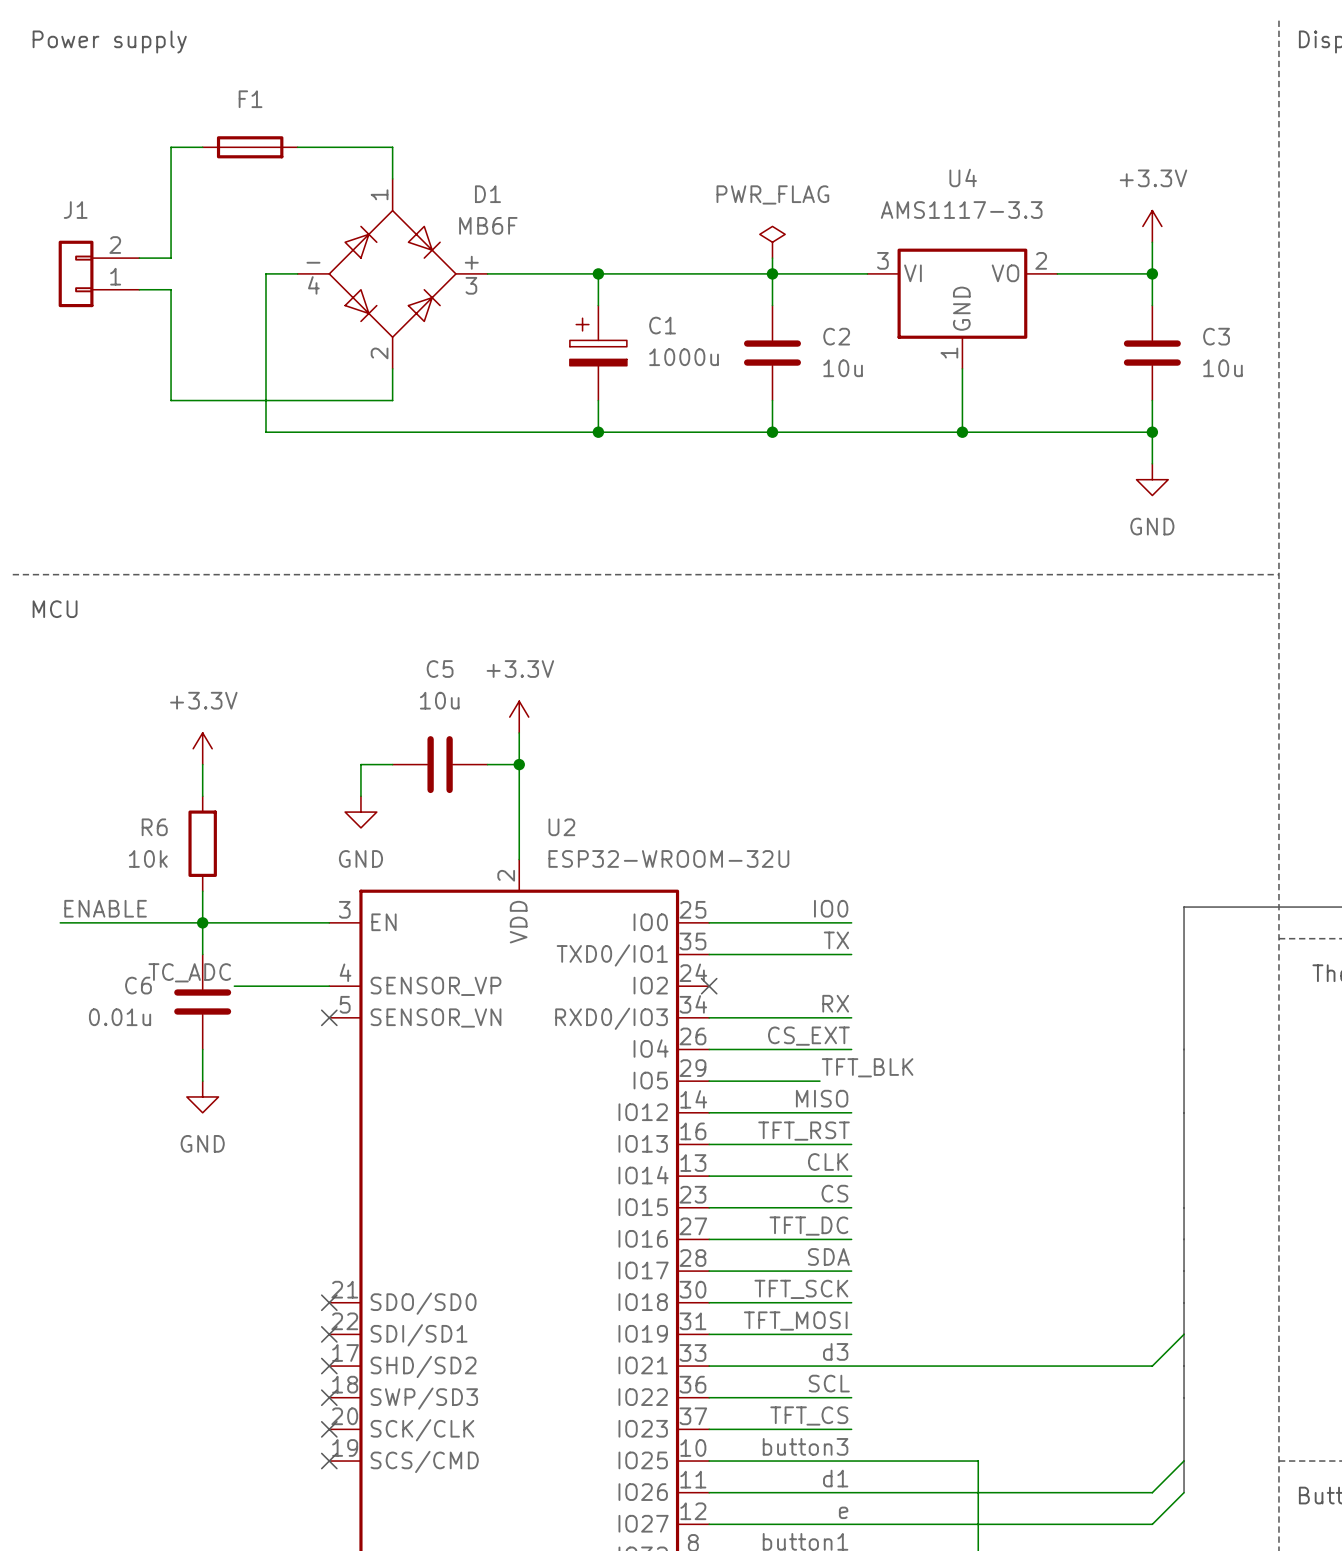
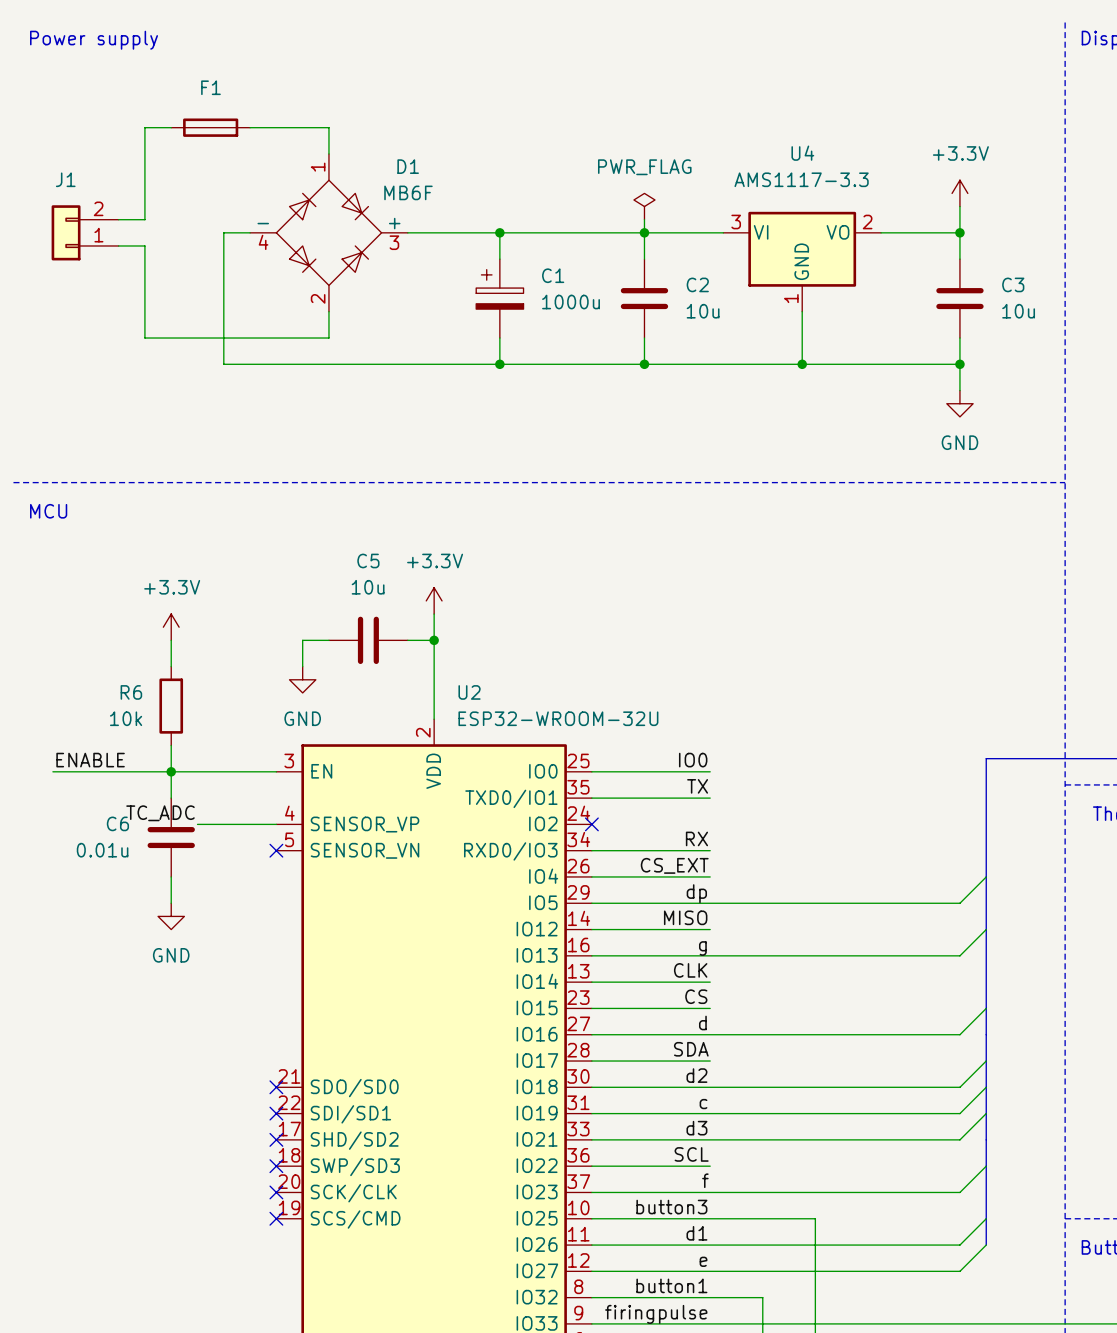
wire: none -> (986, 876) (959, 903) (683, 903)
label: TFT_BLK (867, 1067) -> dp (696, 893)
wire: none -> (986, 929) (959, 955) (710, 955)
label: TFT_RST (804, 1131) -> g (702, 948)
wire: none -> (986, 1008) (959, 1034) (710, 1034)
label: TFT_DC (808, 1226) -> d (702, 1022)
wire: none -> (986, 1061) (959, 1087) (710, 1087)
label: TFT_SCK (801, 1289) -> d2 (696, 1075)
wire: none -> (986, 1087) (959, 1113) (710, 1113)
label: TFT_MOSI (795, 1321) -> c (703, 1104)
wire: none -> (986, 1166) (959, 1192) (710, 1192)
label: TFT_CS (809, 1415) -> f (705, 1180)

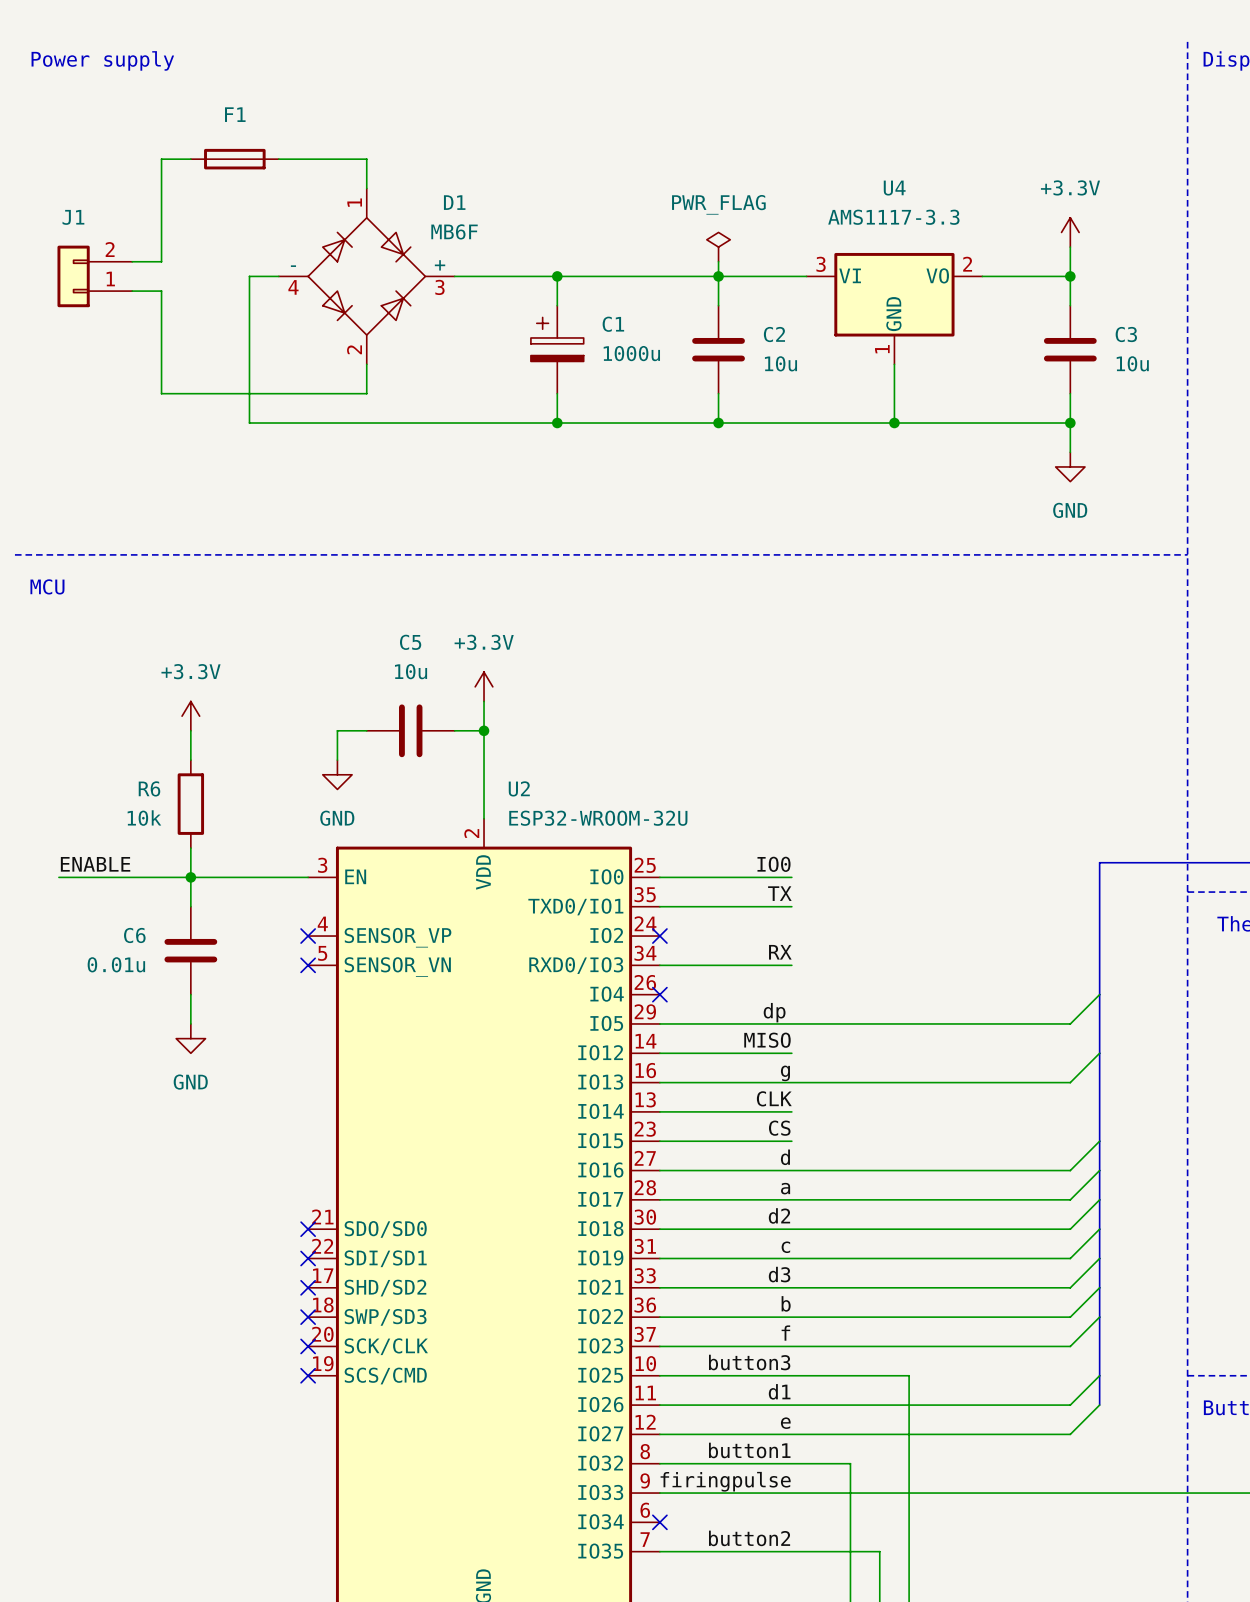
label: TC_ADC (160, 813) -> none
wire: (197, 824) (276, 824) -> none
no-connect mark: none -> (308, 936)
label: CS_EXT (674, 865) -> none
wire: (591, 876) (710, 876) -> none
no-connect mark: none -> (659, 994)
wire: none -> (1099, 1170) (1070, 1199) (791, 1199)
label: SDA (691, 1049) -> a (785, 1188)
wire: none -> (1099, 1287) (1070, 1317) (791, 1317)
label: SCL (691, 1154) -> b (786, 1303)

